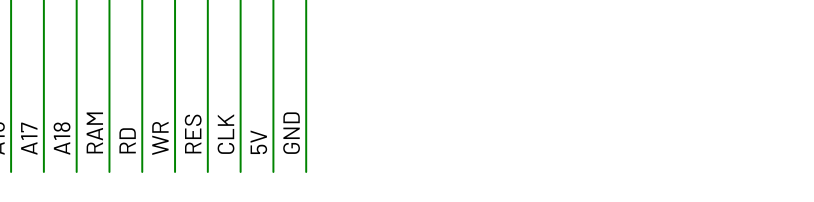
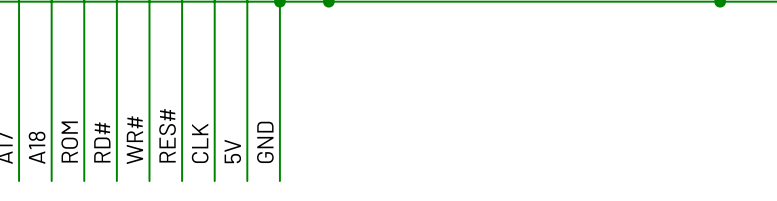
label: RAM (94, 132) -> ROM (69, 142)
label: RES (193, 134) -> RES# (167, 135)
label: WR (160, 138) -> WR# (134, 140)
label: RD (127, 140) -> RD# (102, 142)

